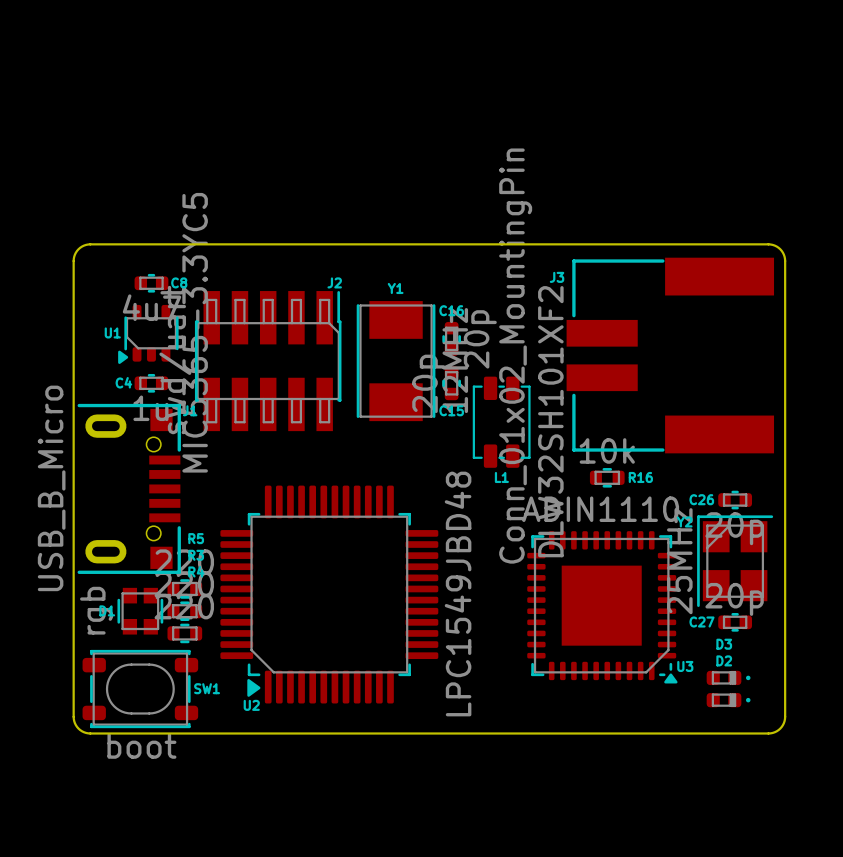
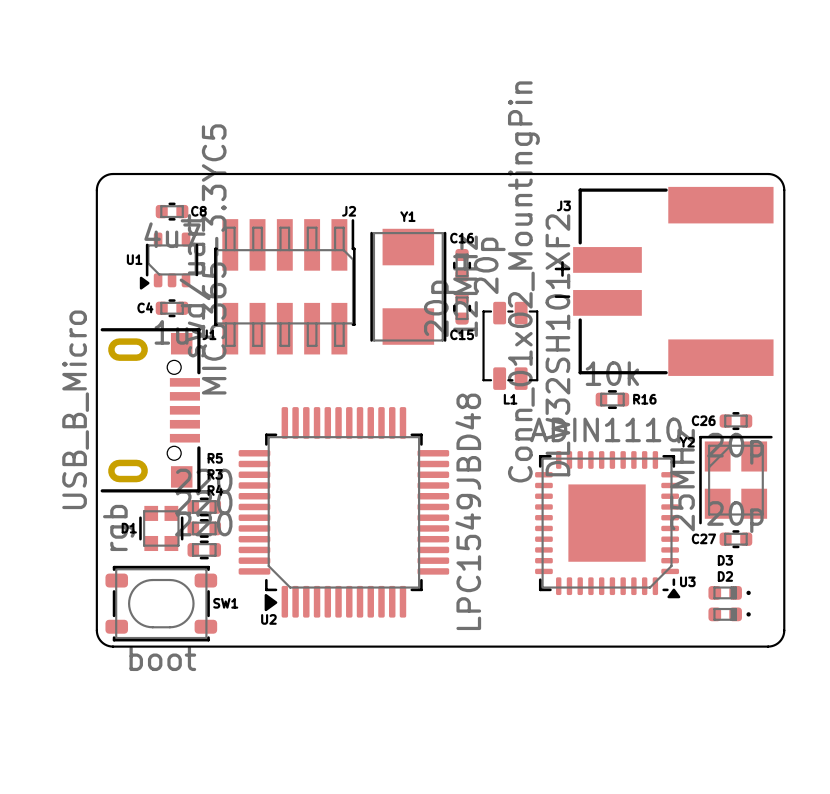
text: none -> + (562, 268)
text: none -> - (562, 296)

